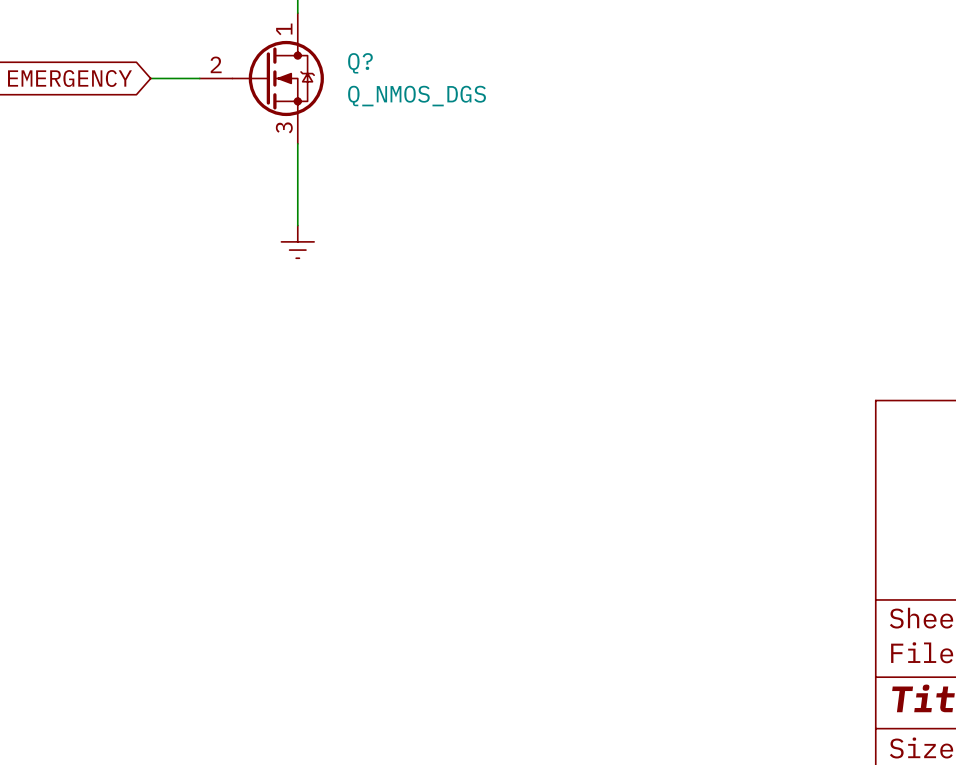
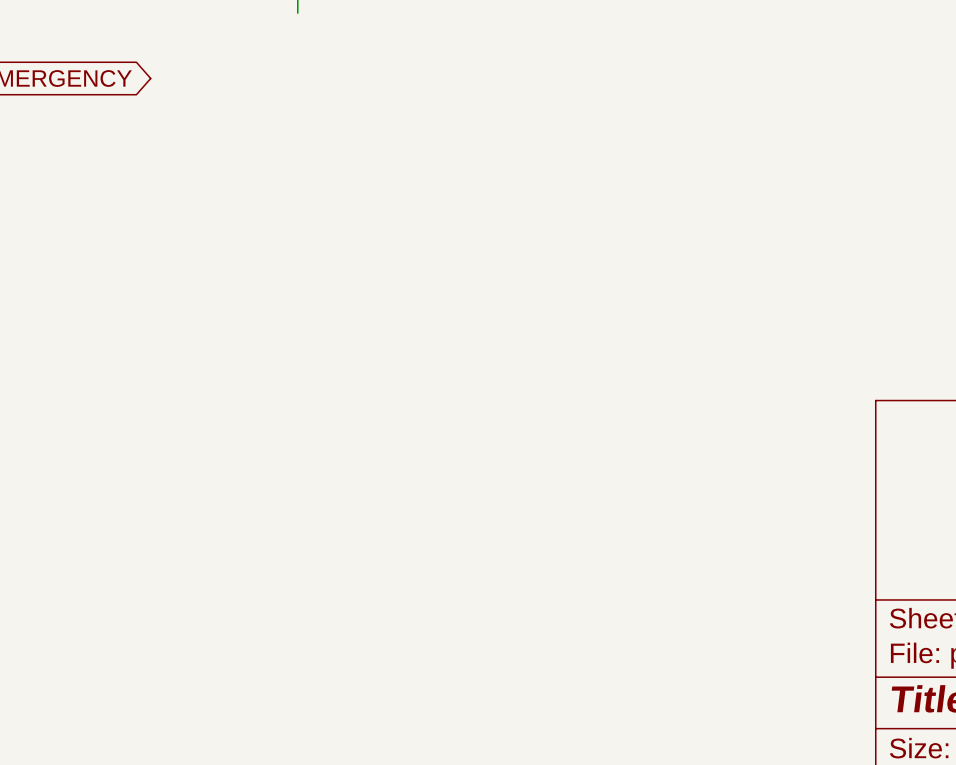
wire: (150, 78) (199, 78) -> none
Q?: Q_NMOS_DGS (261, 78) -> none
wire: (297, 143) (297, 225) -> none
power symbol: (297, 241) -> none

